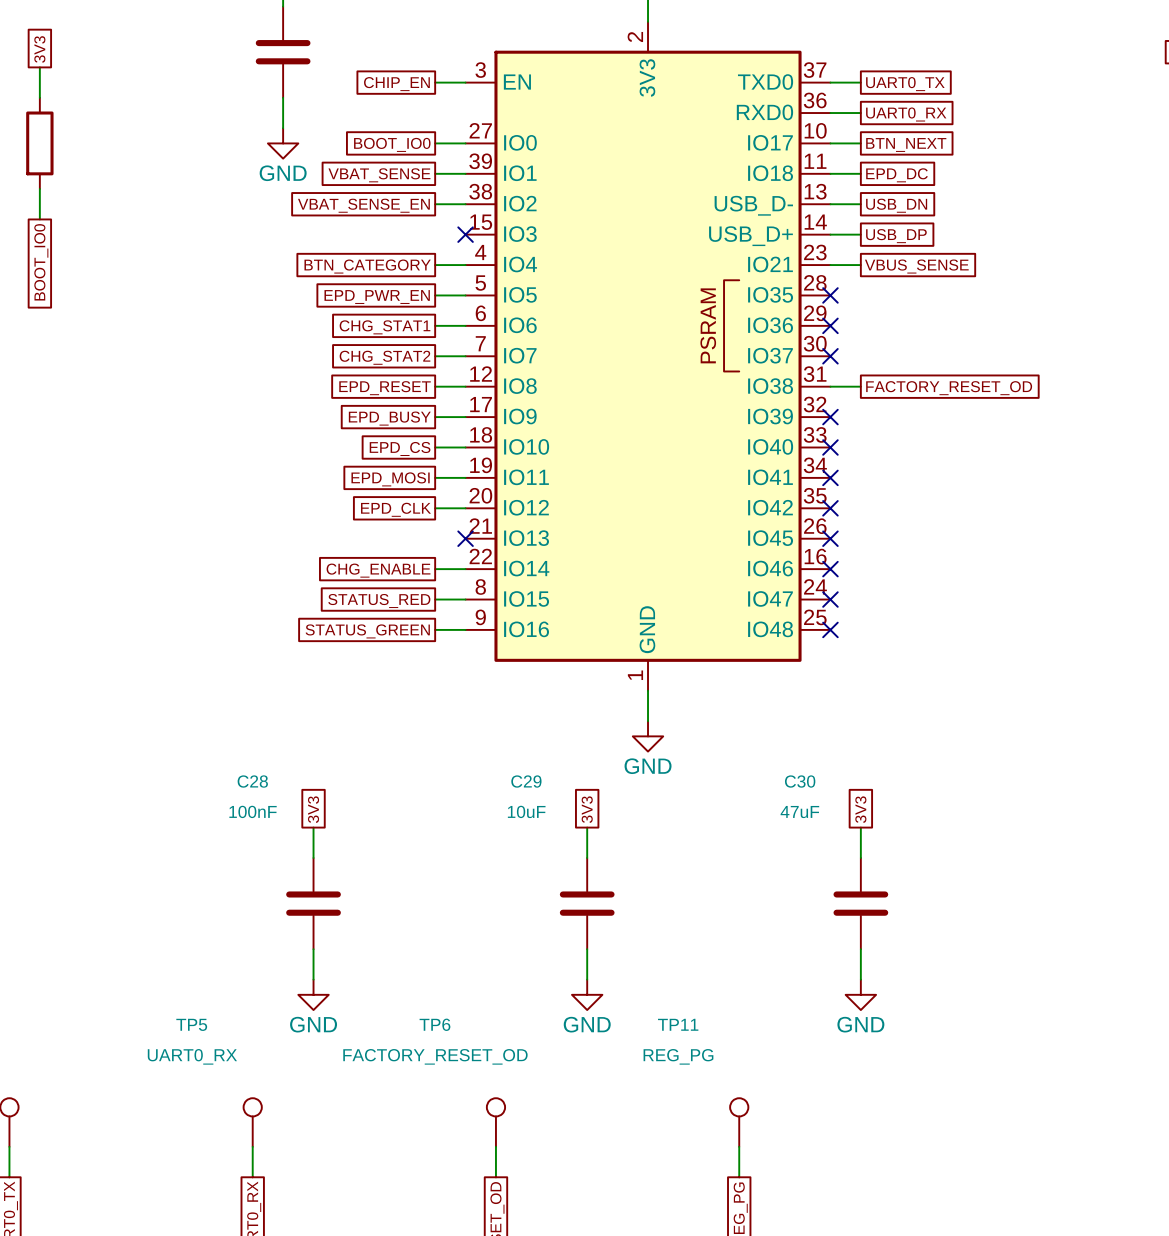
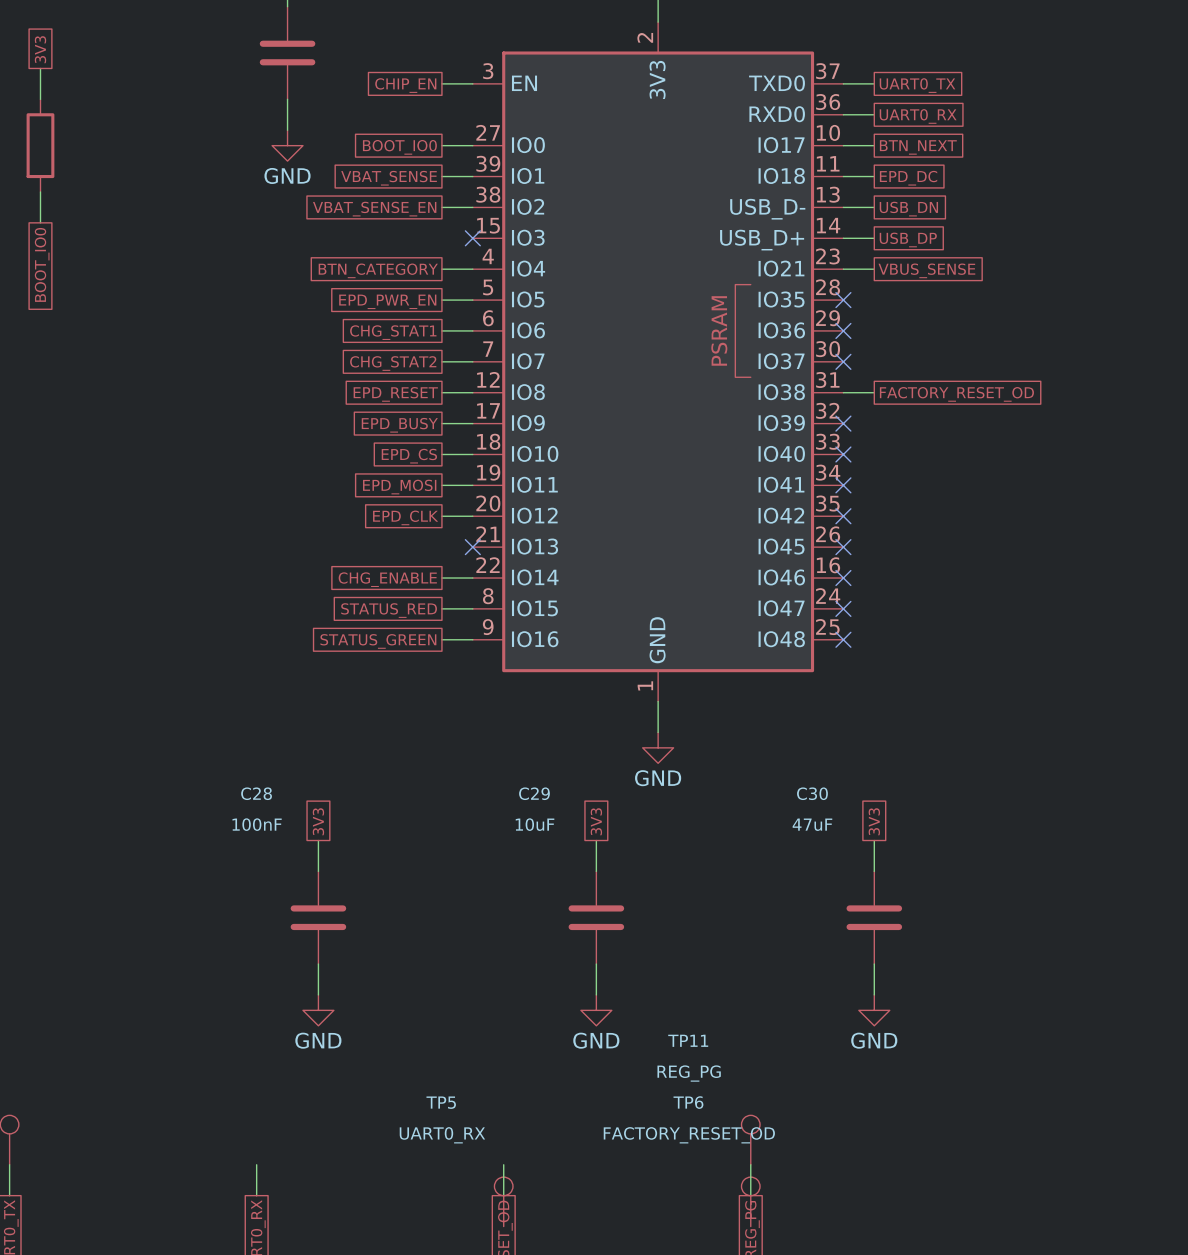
TP5 position: (252, 1122) -> (503, 1201)
TP6 position: (495, 1122) -> (750, 1201)

